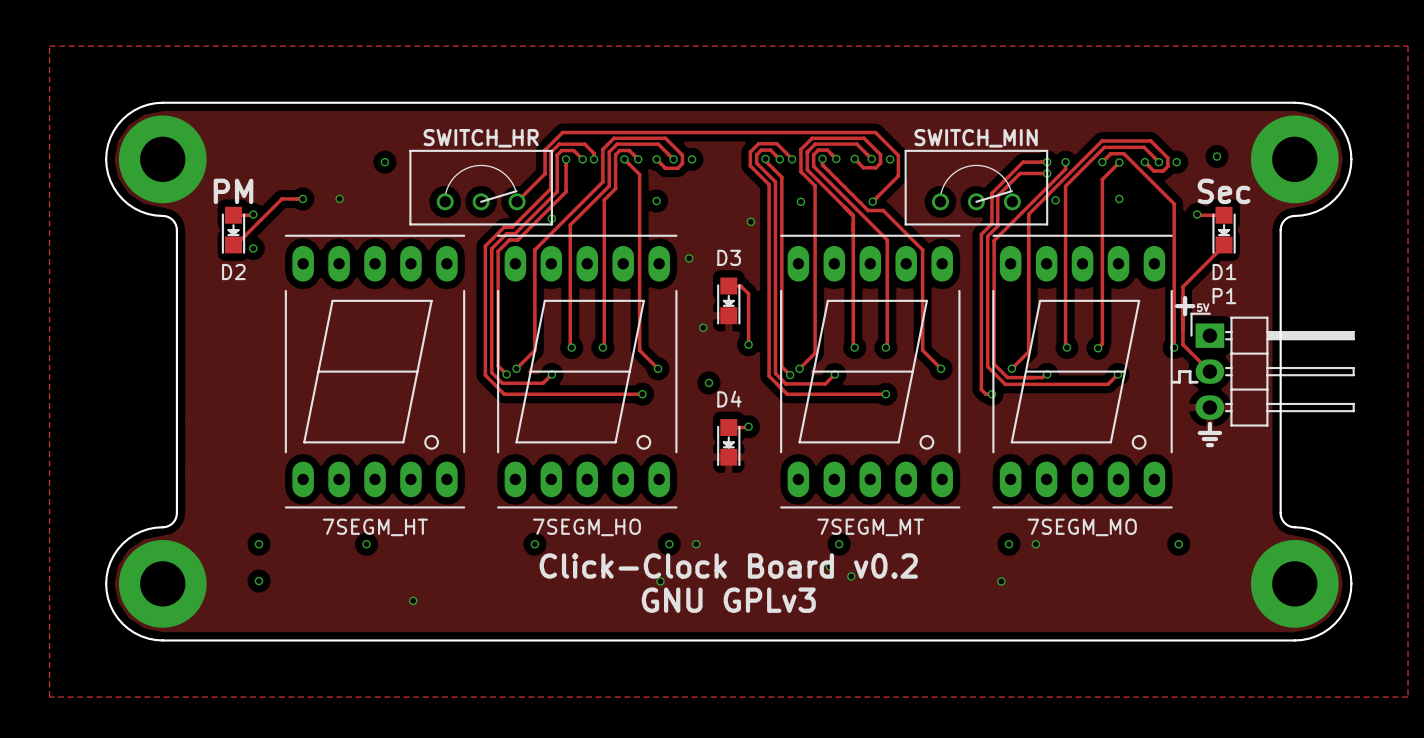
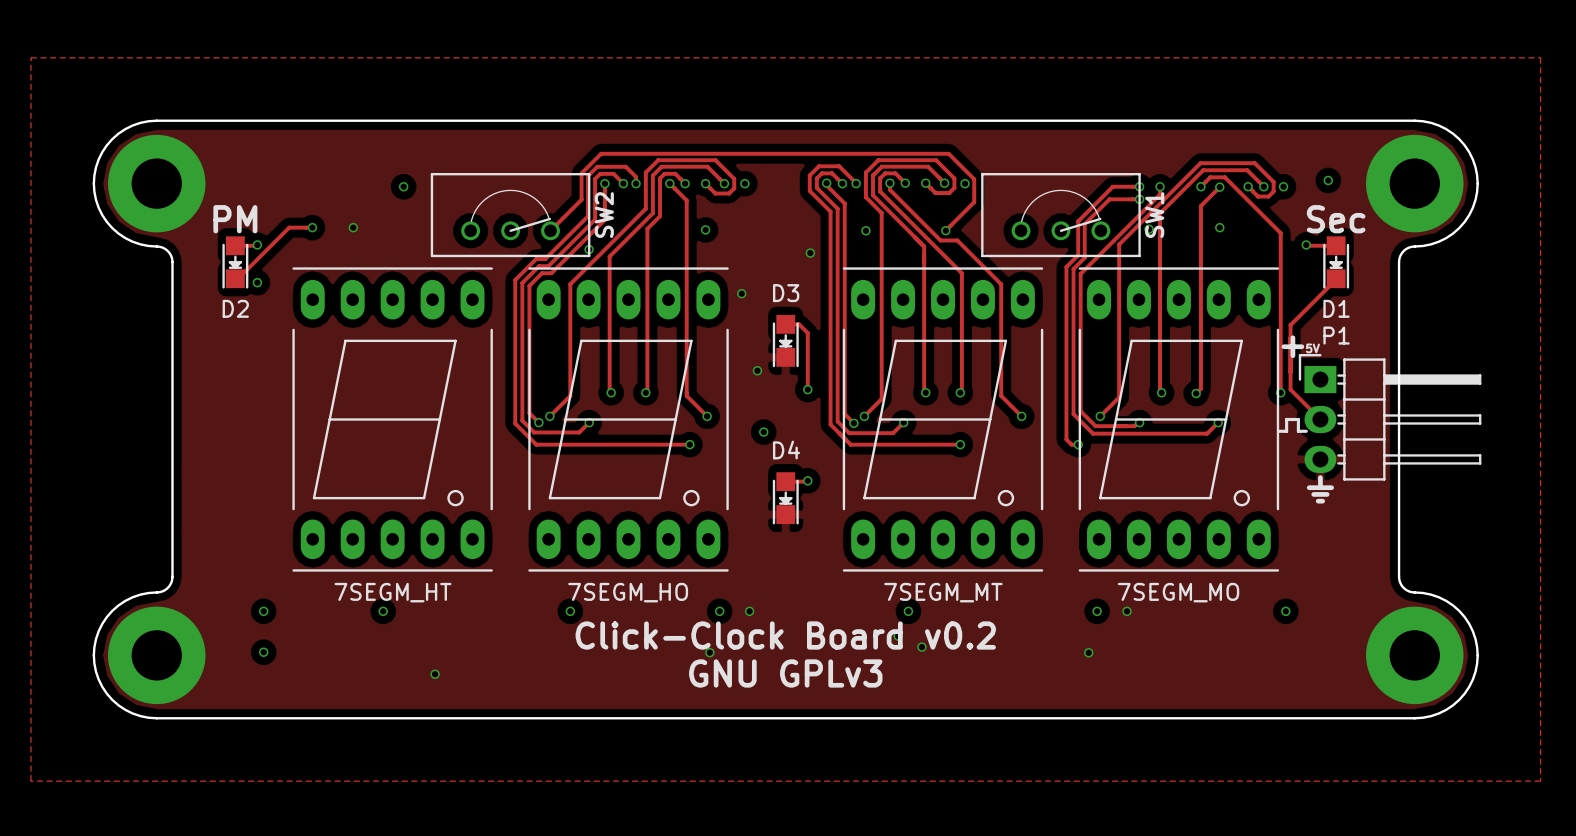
SW2 value: SWITCH_HR (481, 138) -> none
SW1 value: SWITCH_MIN (976, 138) -> none
SW2 name: none -> SW2 (604, 215)
SW1 name: none -> SW1 (1154, 215)

